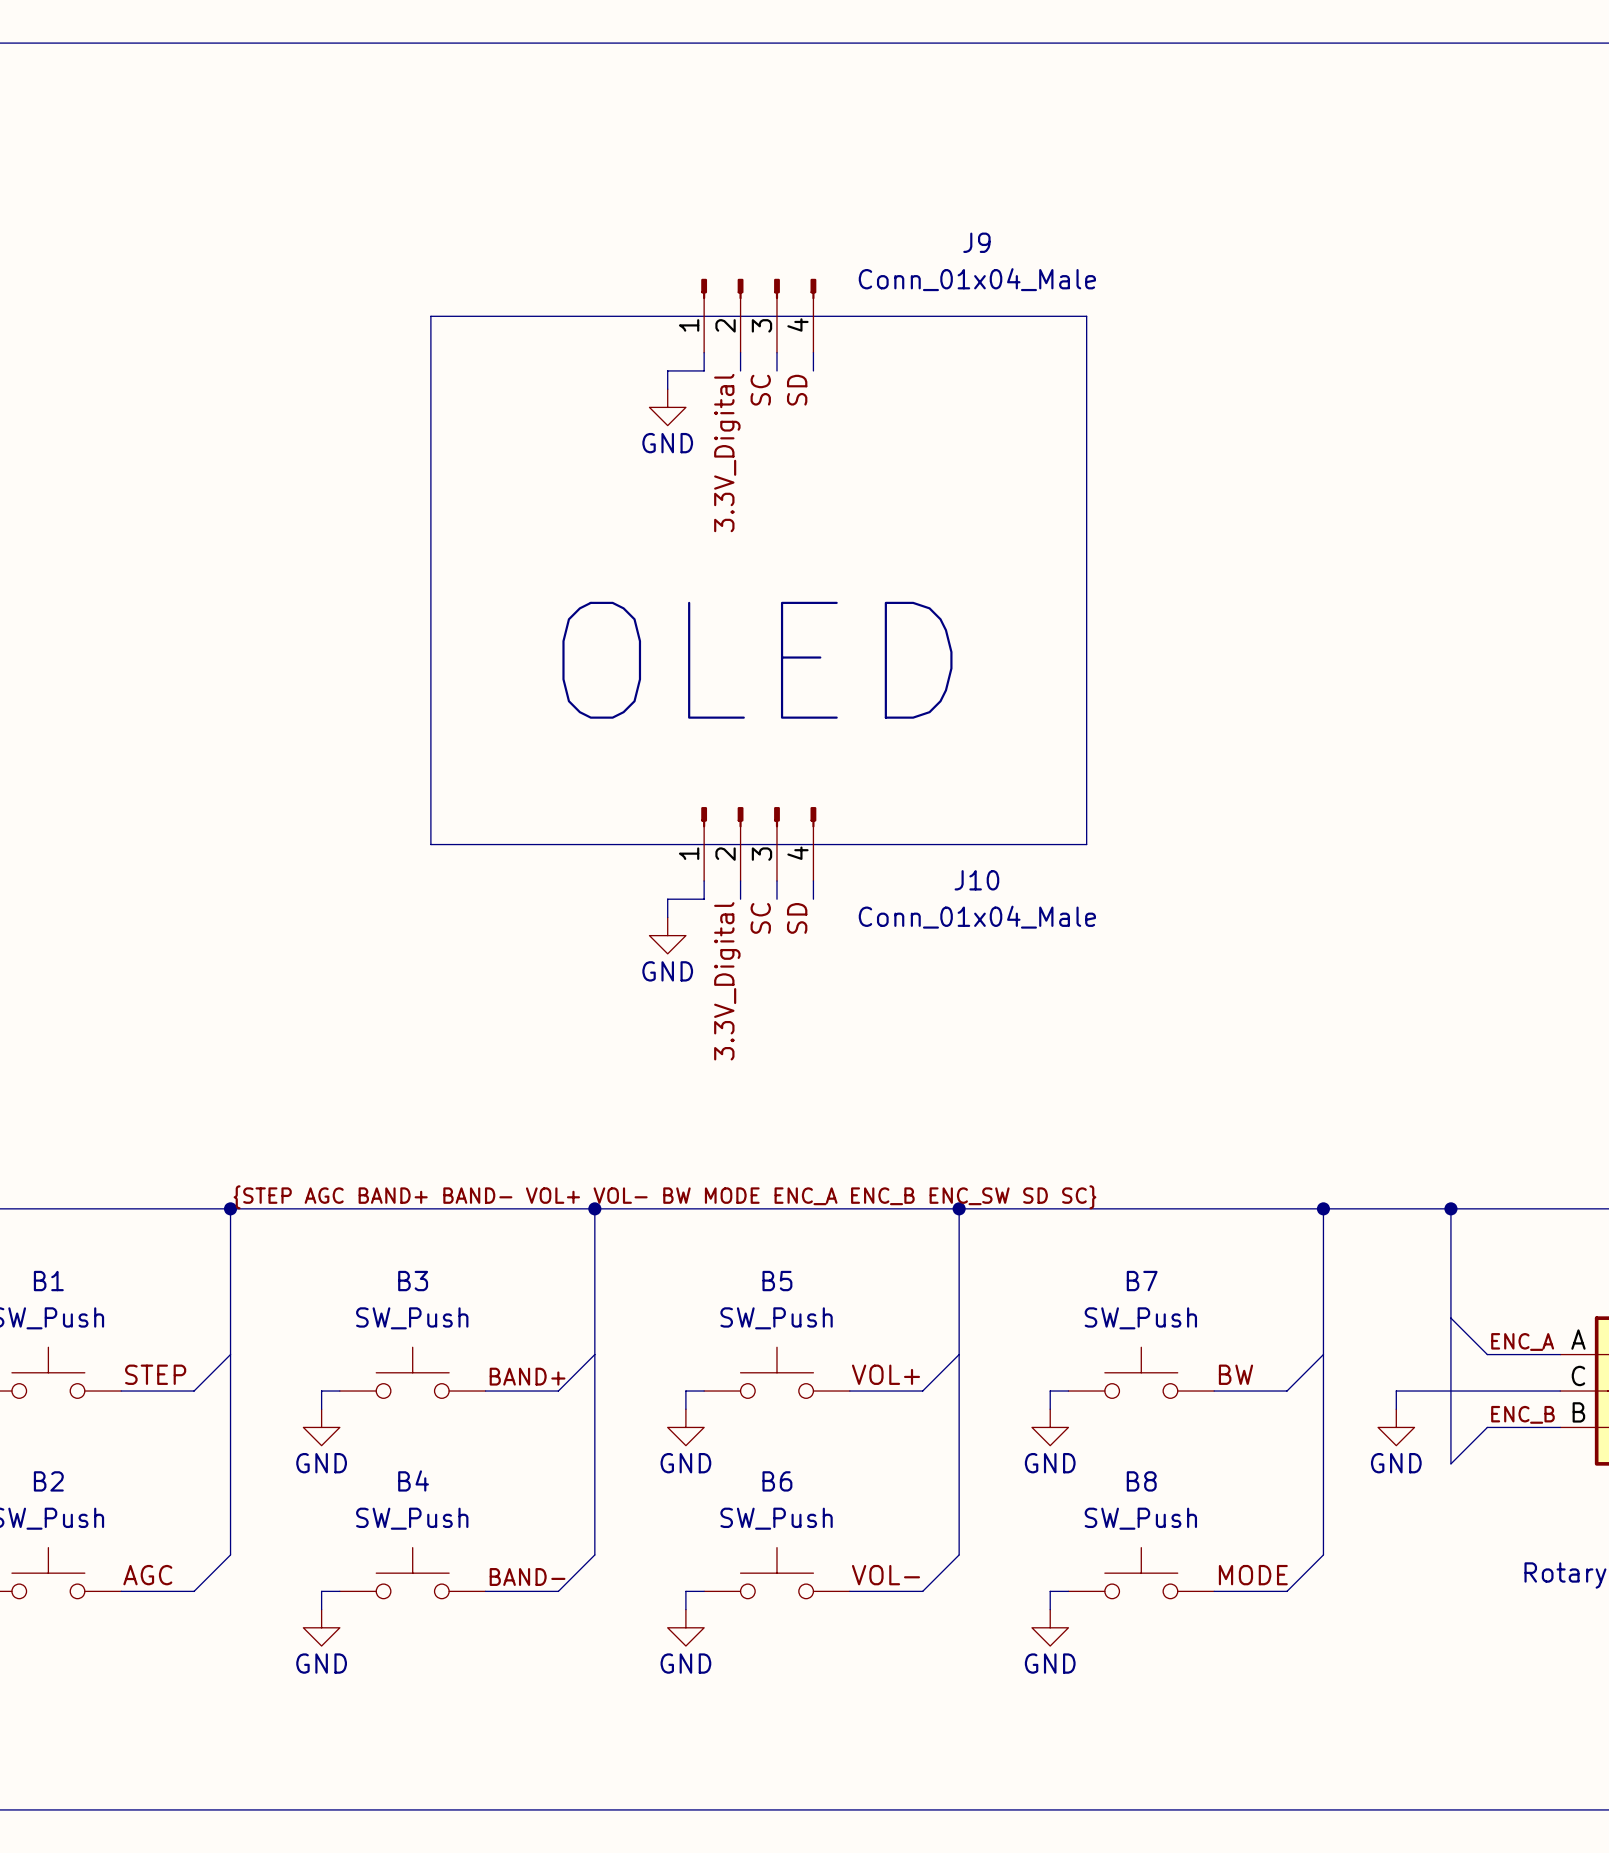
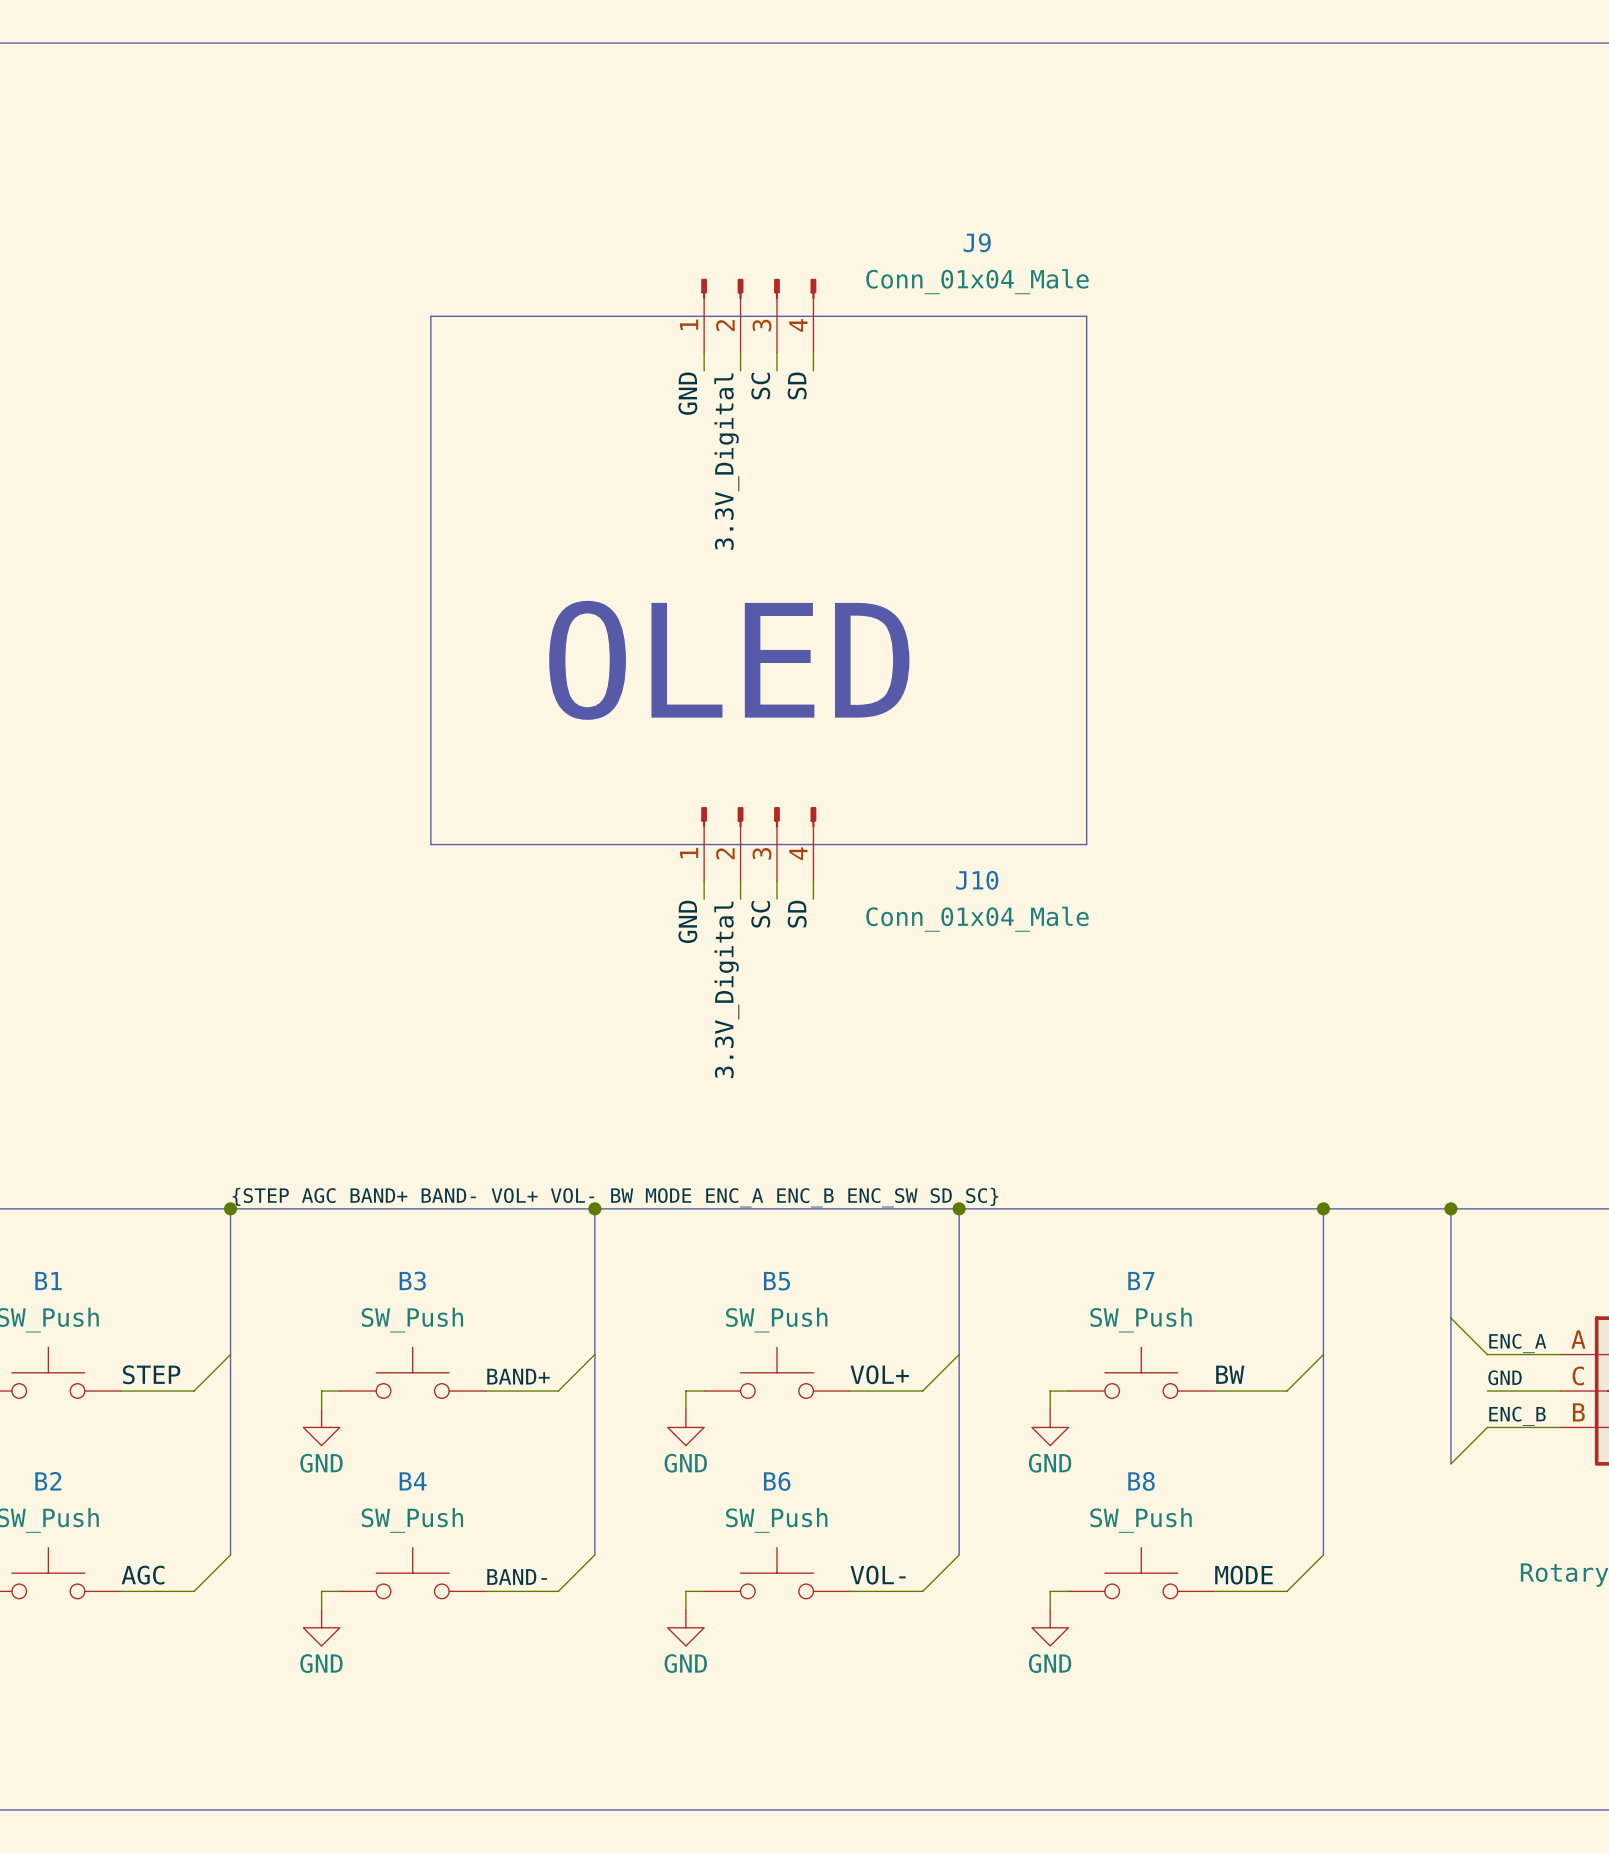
wire: (704, 370) (667, 370) (667, 389) -> none
label: none -> GND (687, 393)
power symbol: GND (667, 407) -> none
wire: (704, 899) (667, 899) (667, 917) -> none
label: none -> GND (687, 921)
power symbol: GND (667, 935) -> none
label: none -> GND (1505, 1377)
wire: (1487, 1391) (1396, 1391) (1396, 1409) -> none
power symbol: GND (1396, 1427) -> none

